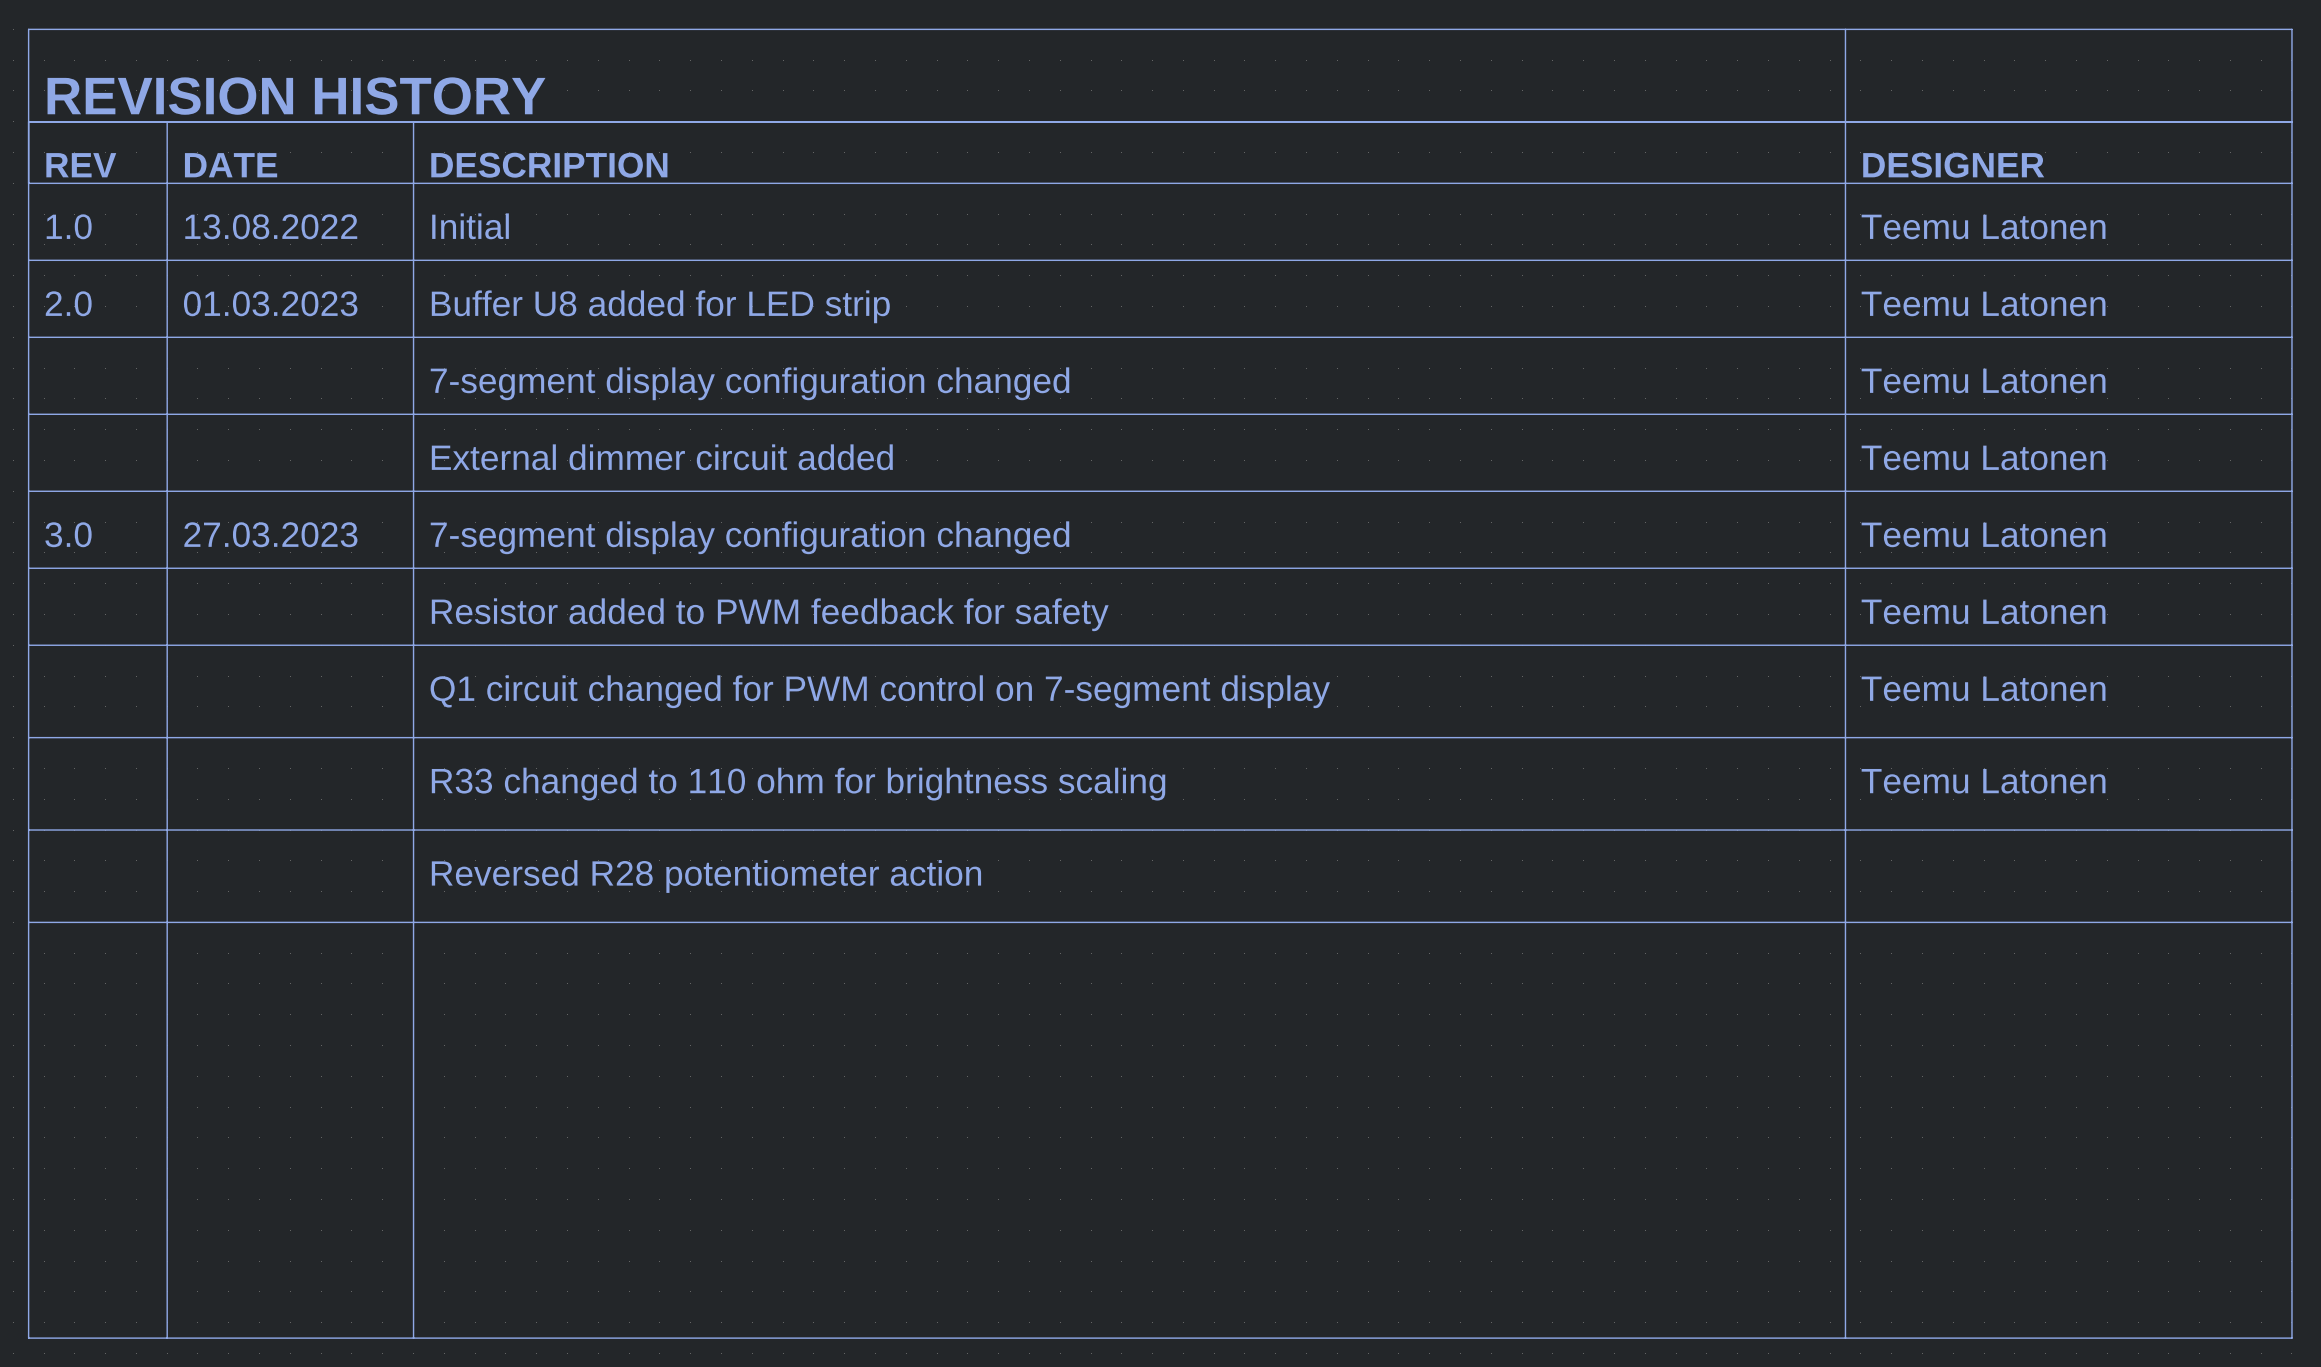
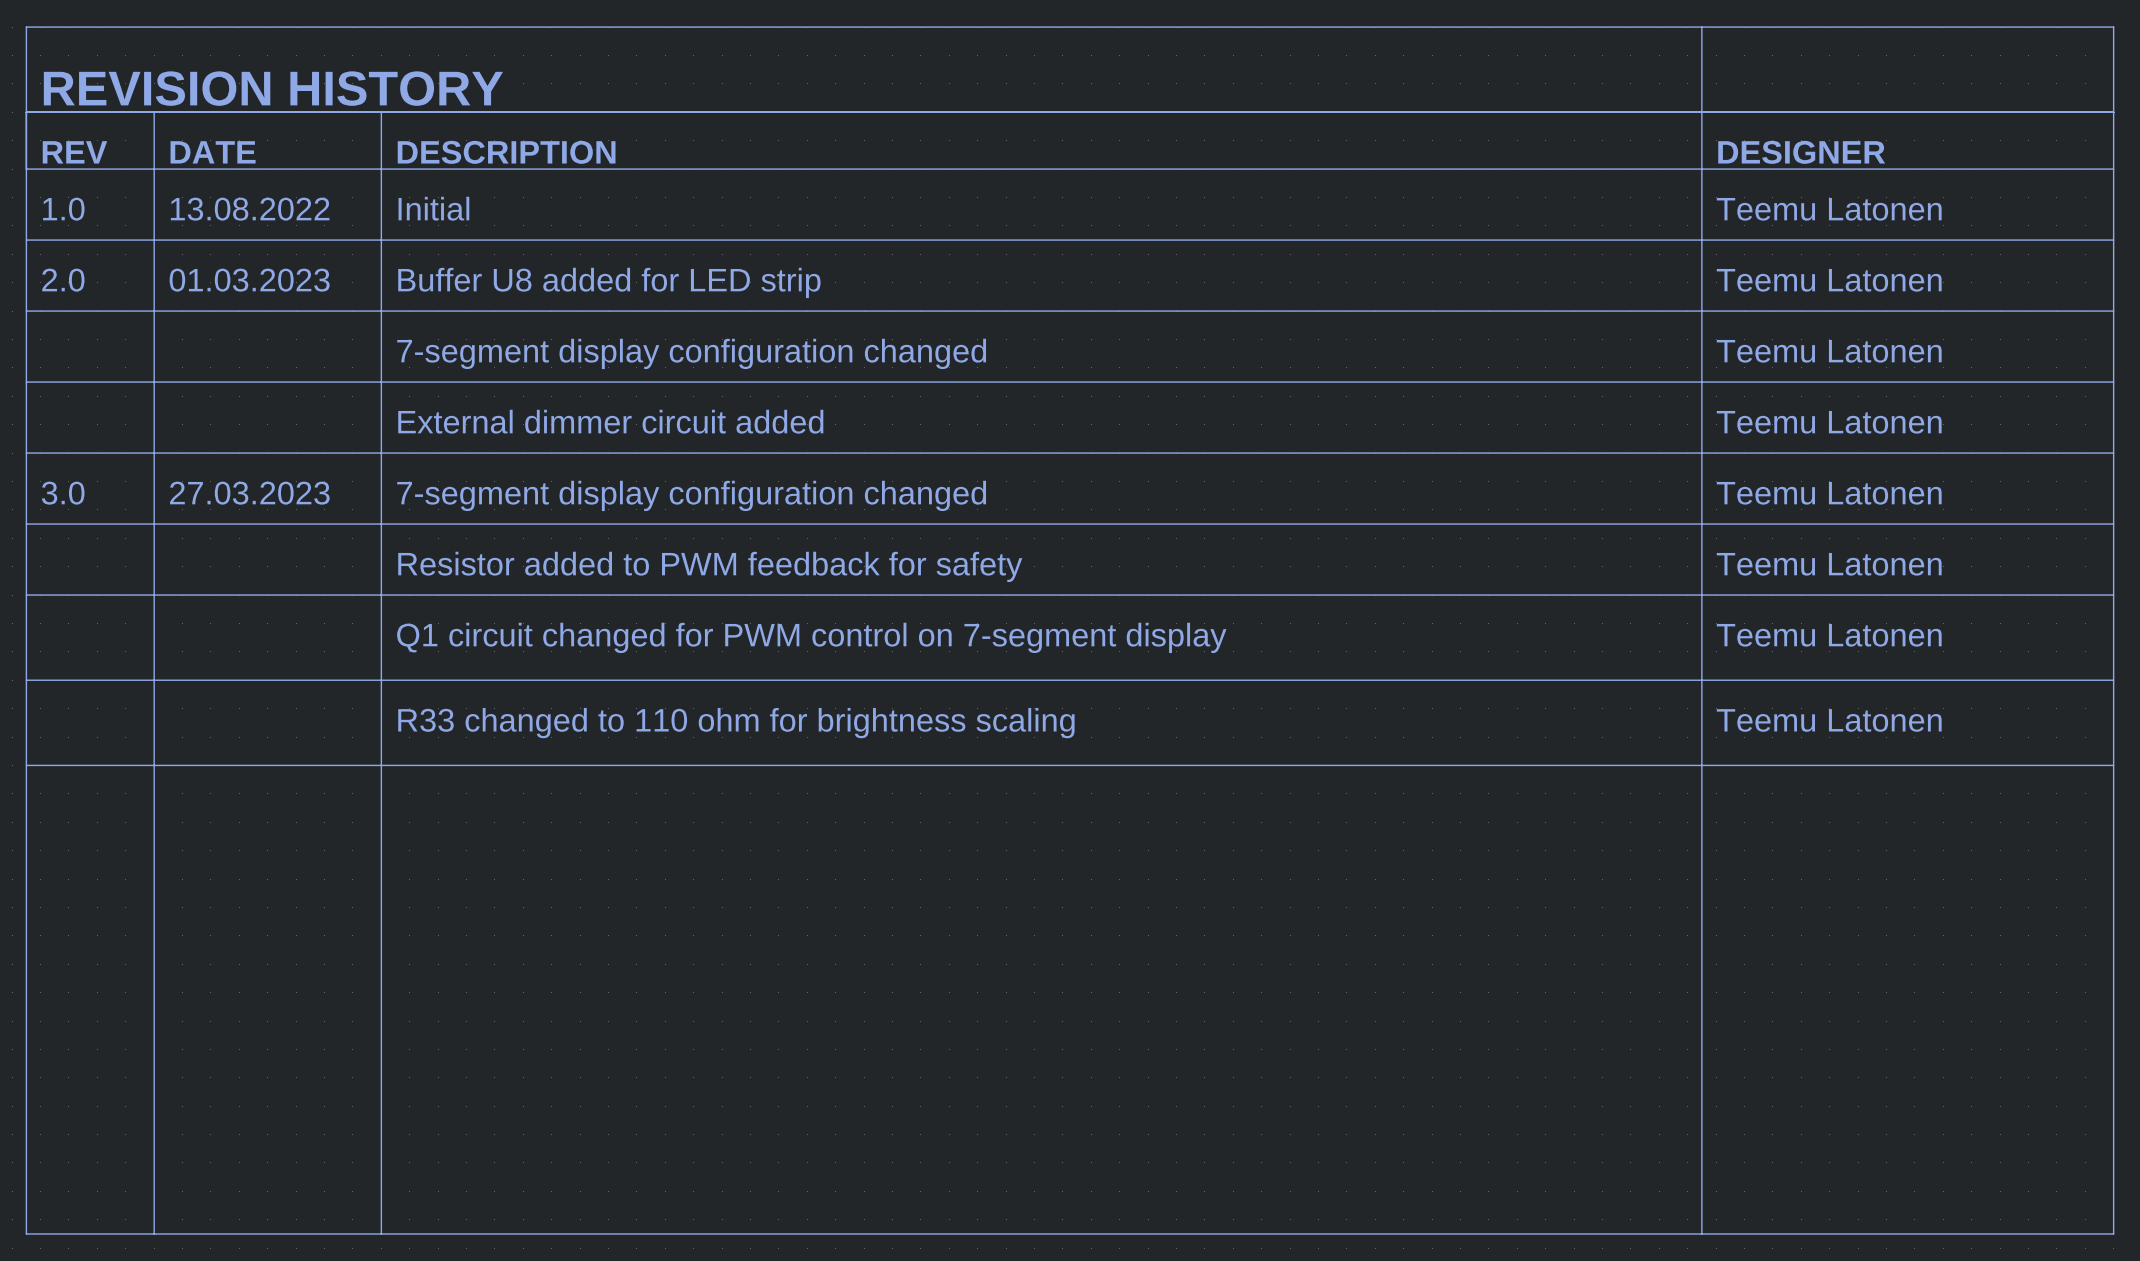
text: Reversed R28 potentiometer action (706, 876) -> none
line: (28, 922) (2291, 922) -> none

